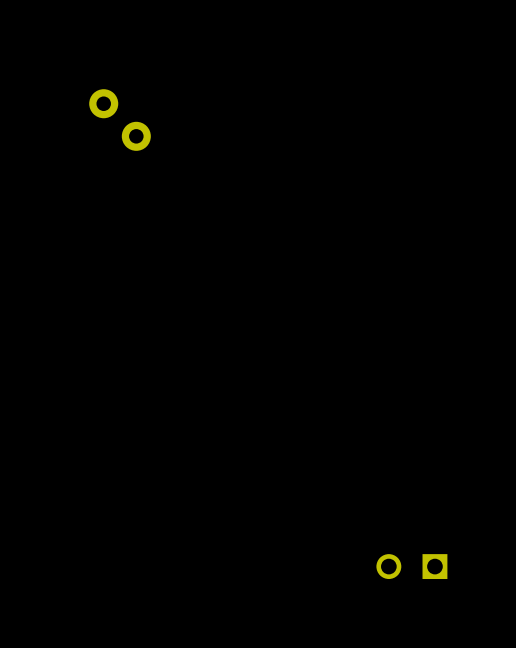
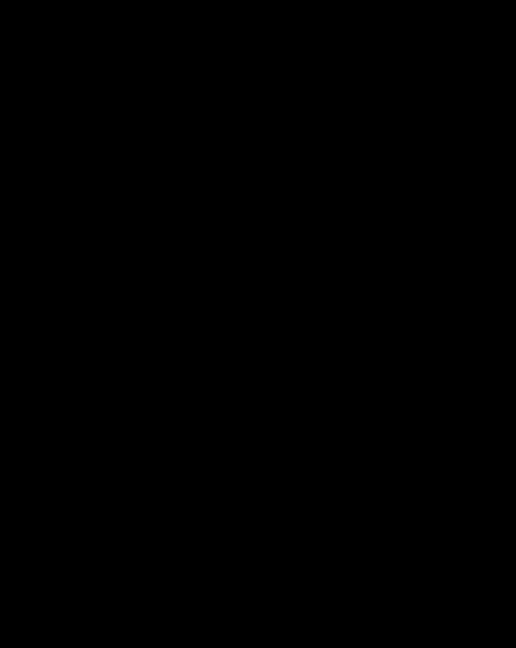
part: (120, 120) -> none
part: (411, 566) -> none

